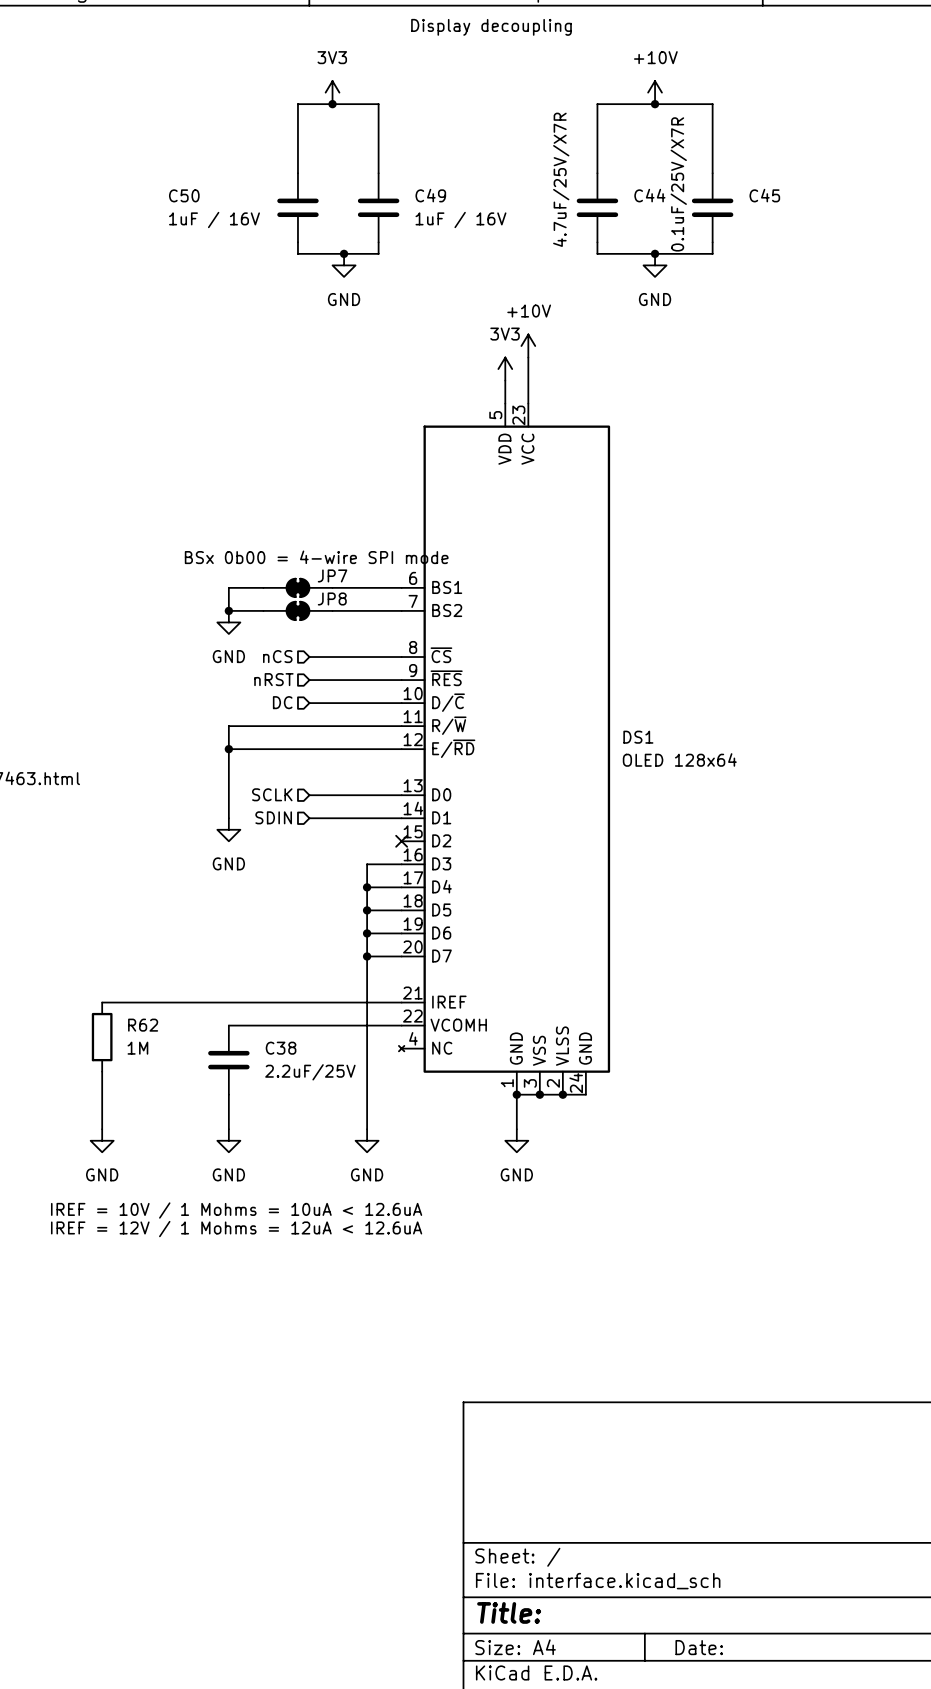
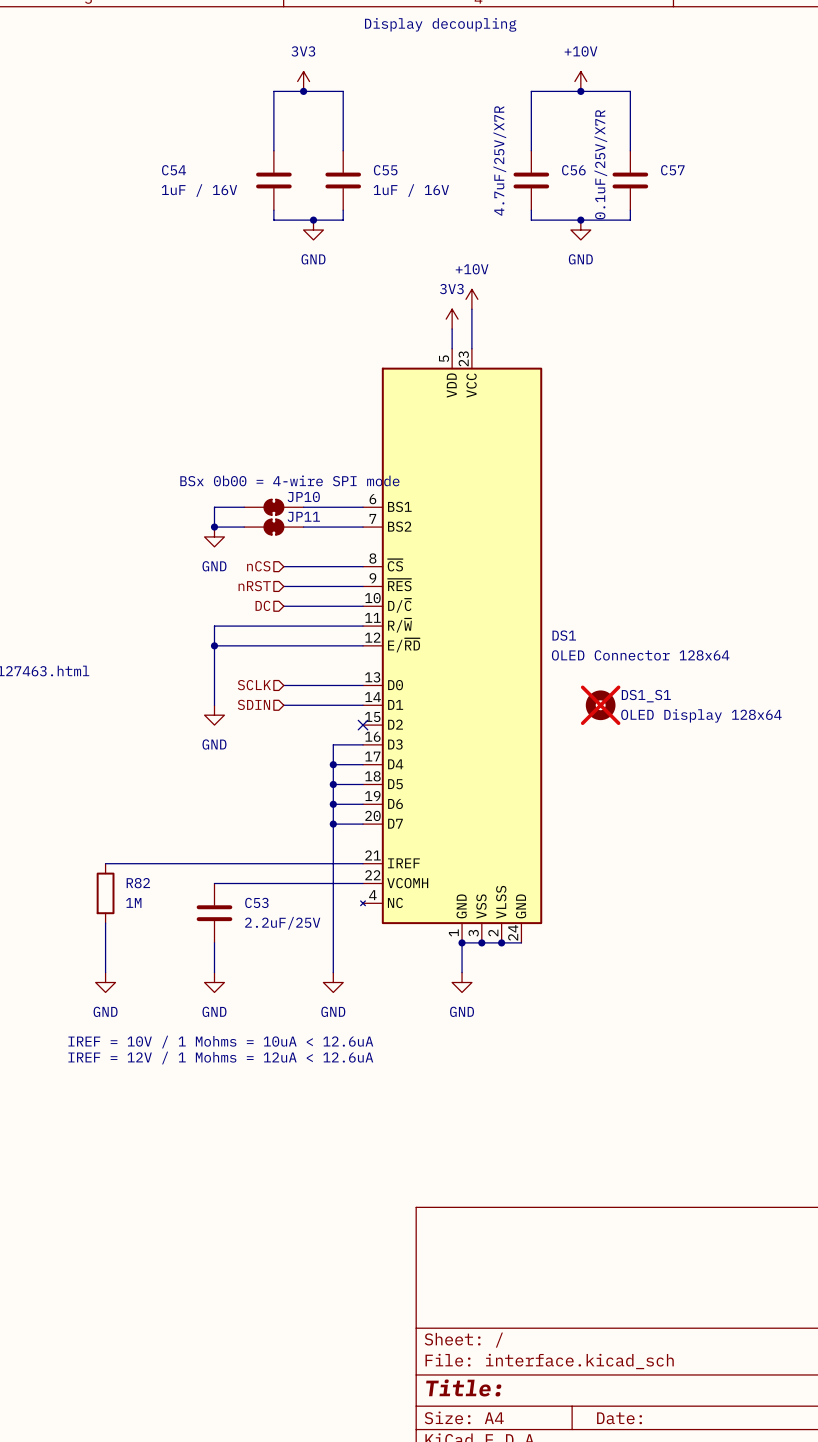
C50 name: C50 (184, 195) -> C54 (174, 170)
C49 name: C49 (430, 195) -> C55 (385, 170)
C44 name: C44 (649, 195) -> C56 (573, 170)
C45 name: C45 (764, 195) -> C57 (672, 170)
JP7 name: JP7 (332, 575) -> JP10 (303, 496)
JP8 name: JP8 (332, 598) -> JP11 (303, 516)
DS1 value: OLED 128x64 (679, 759) -> OLED Connector 128x64 (640, 655)
DS1_S1: none -> OLED Display 128x64 (600, 705)
R62 name: R62 (143, 1025) -> R82 (138, 883)
C38 name: C38 (281, 1048) -> C53 (256, 902)

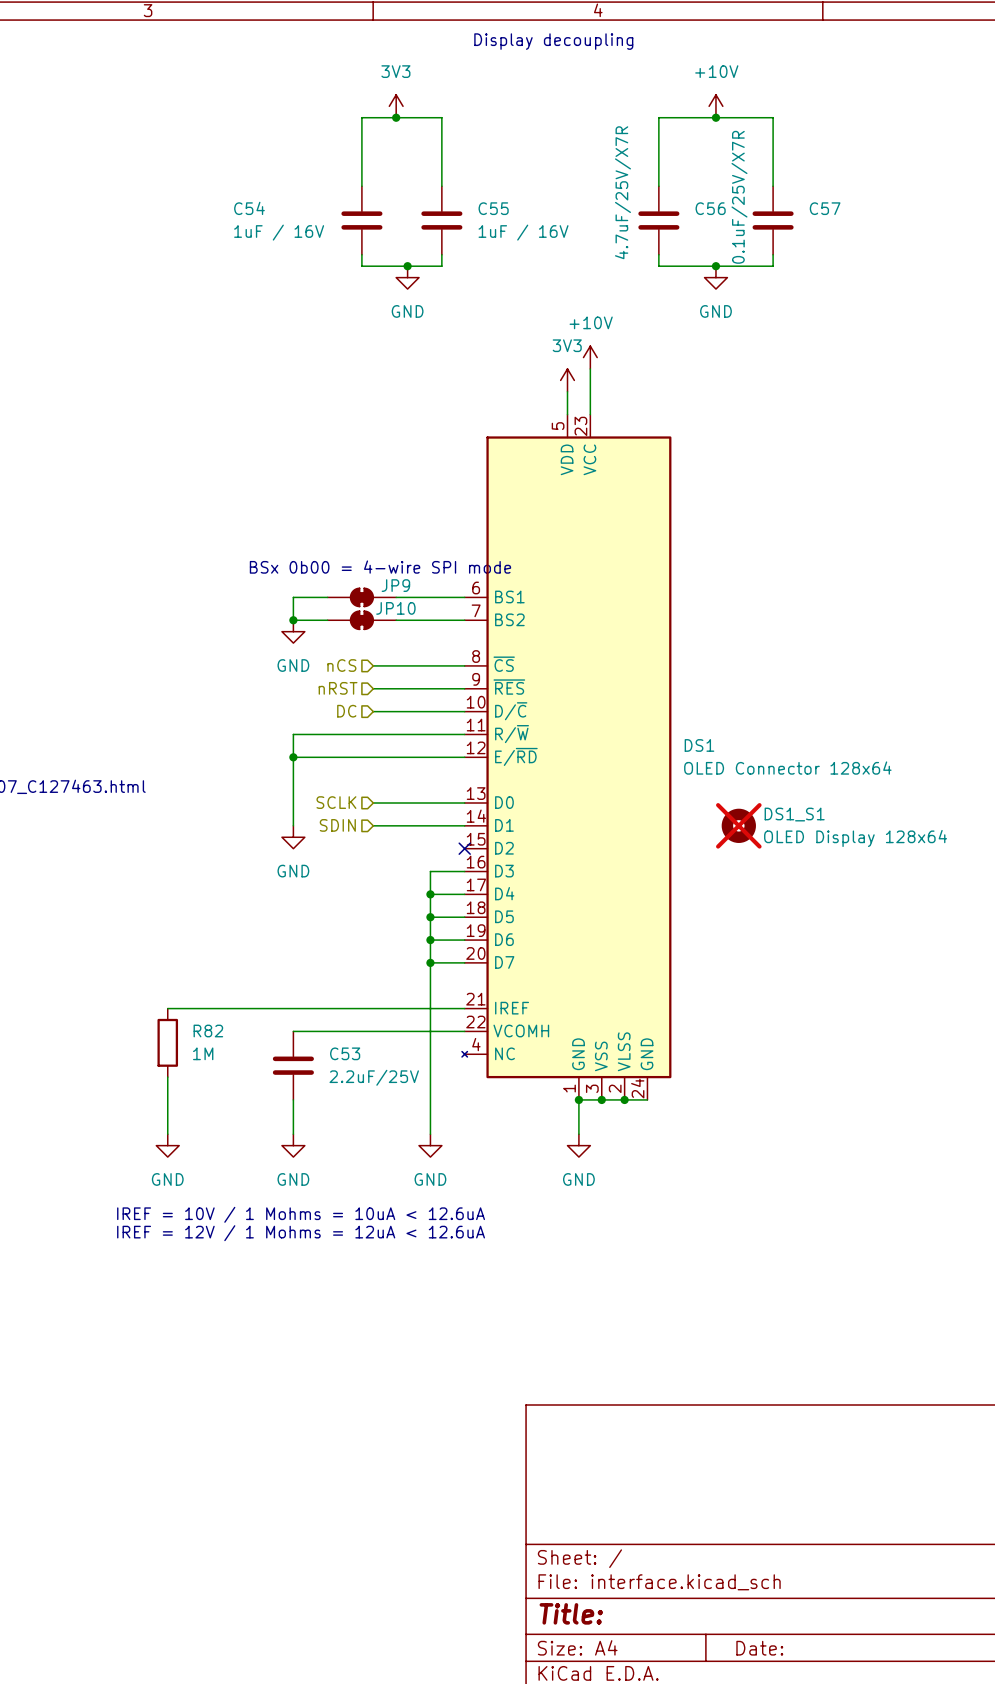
JP10 name: JP10 (303, 496) -> JP9 (395, 585)
JP11 name: JP11 (303, 516) -> JP10 (395, 608)

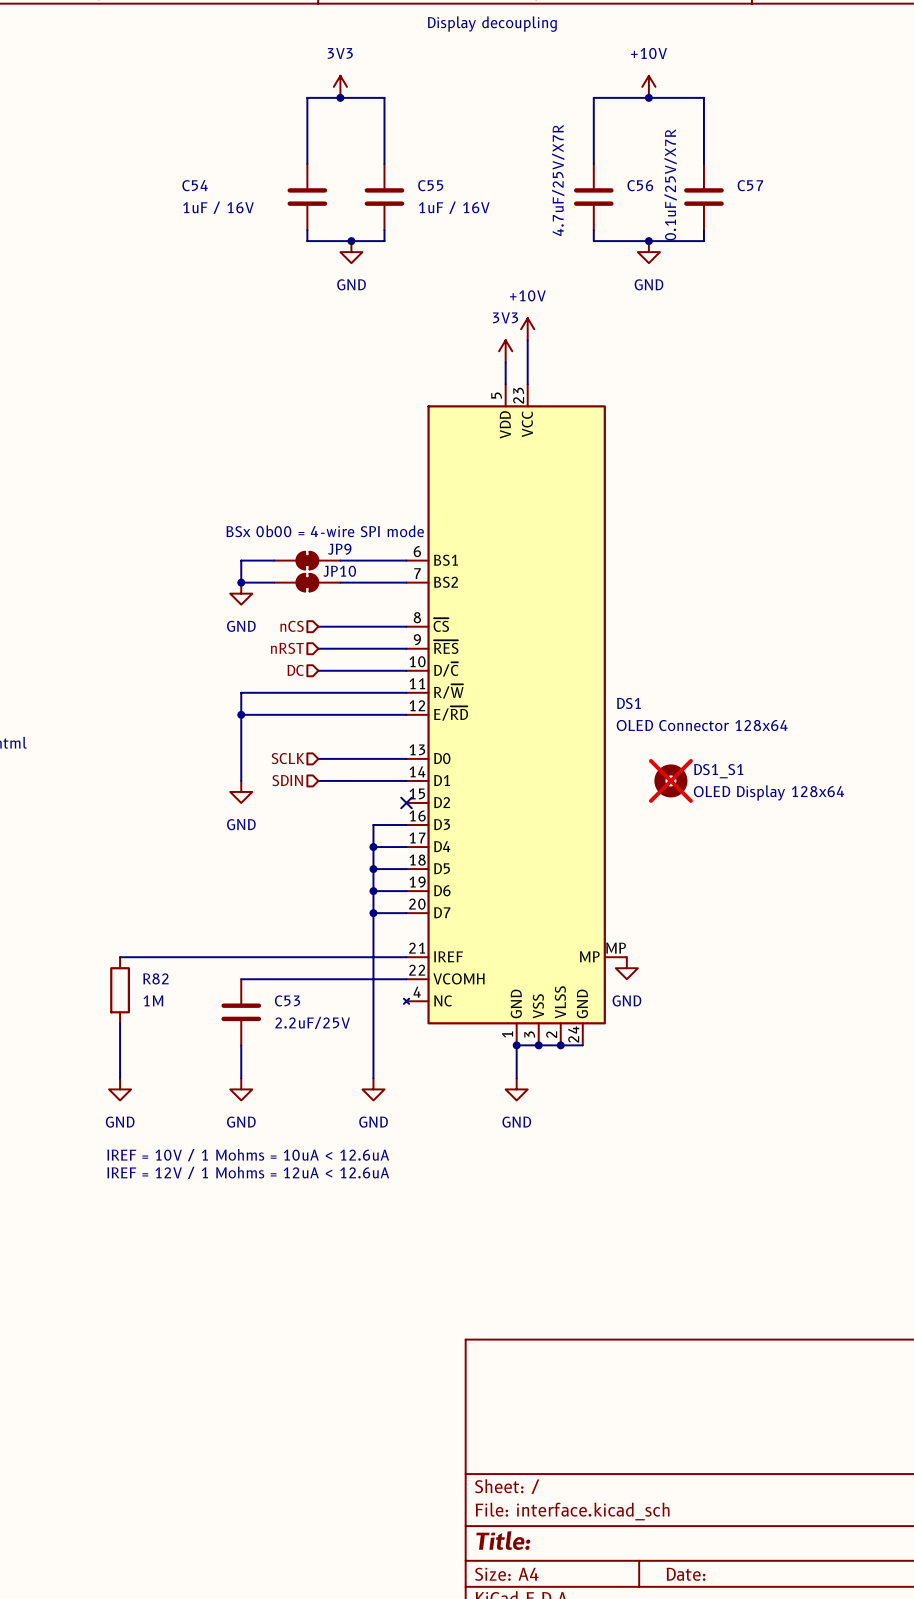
DS1 symbol: [462, 414, 672, 1100] -> [403, 384, 627, 1046]
power symbol: none -> GND (626, 968)

